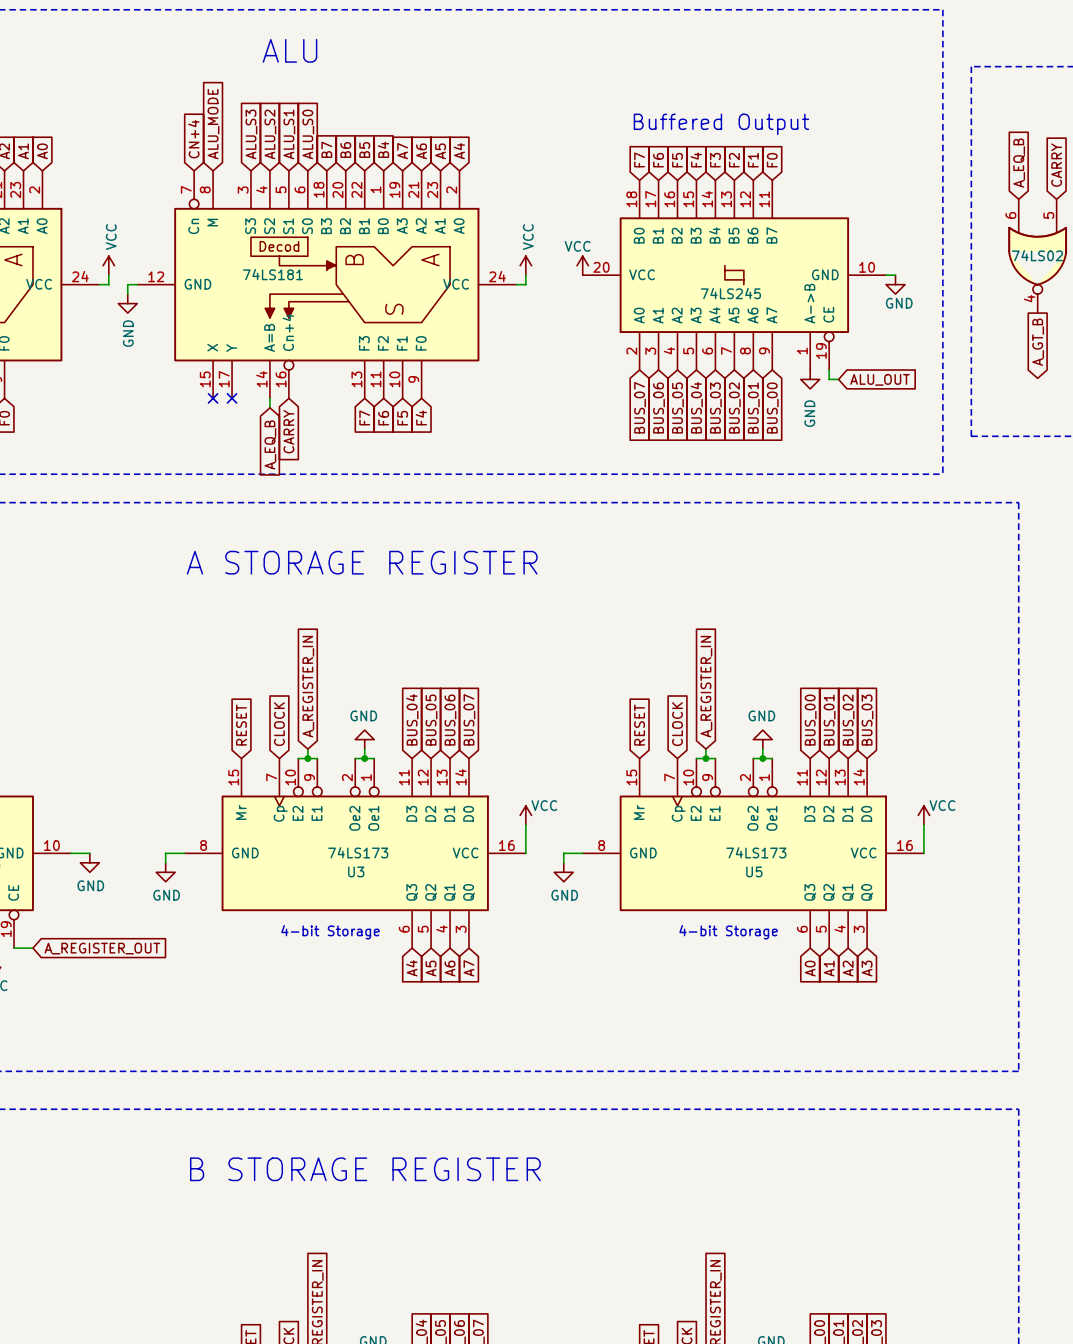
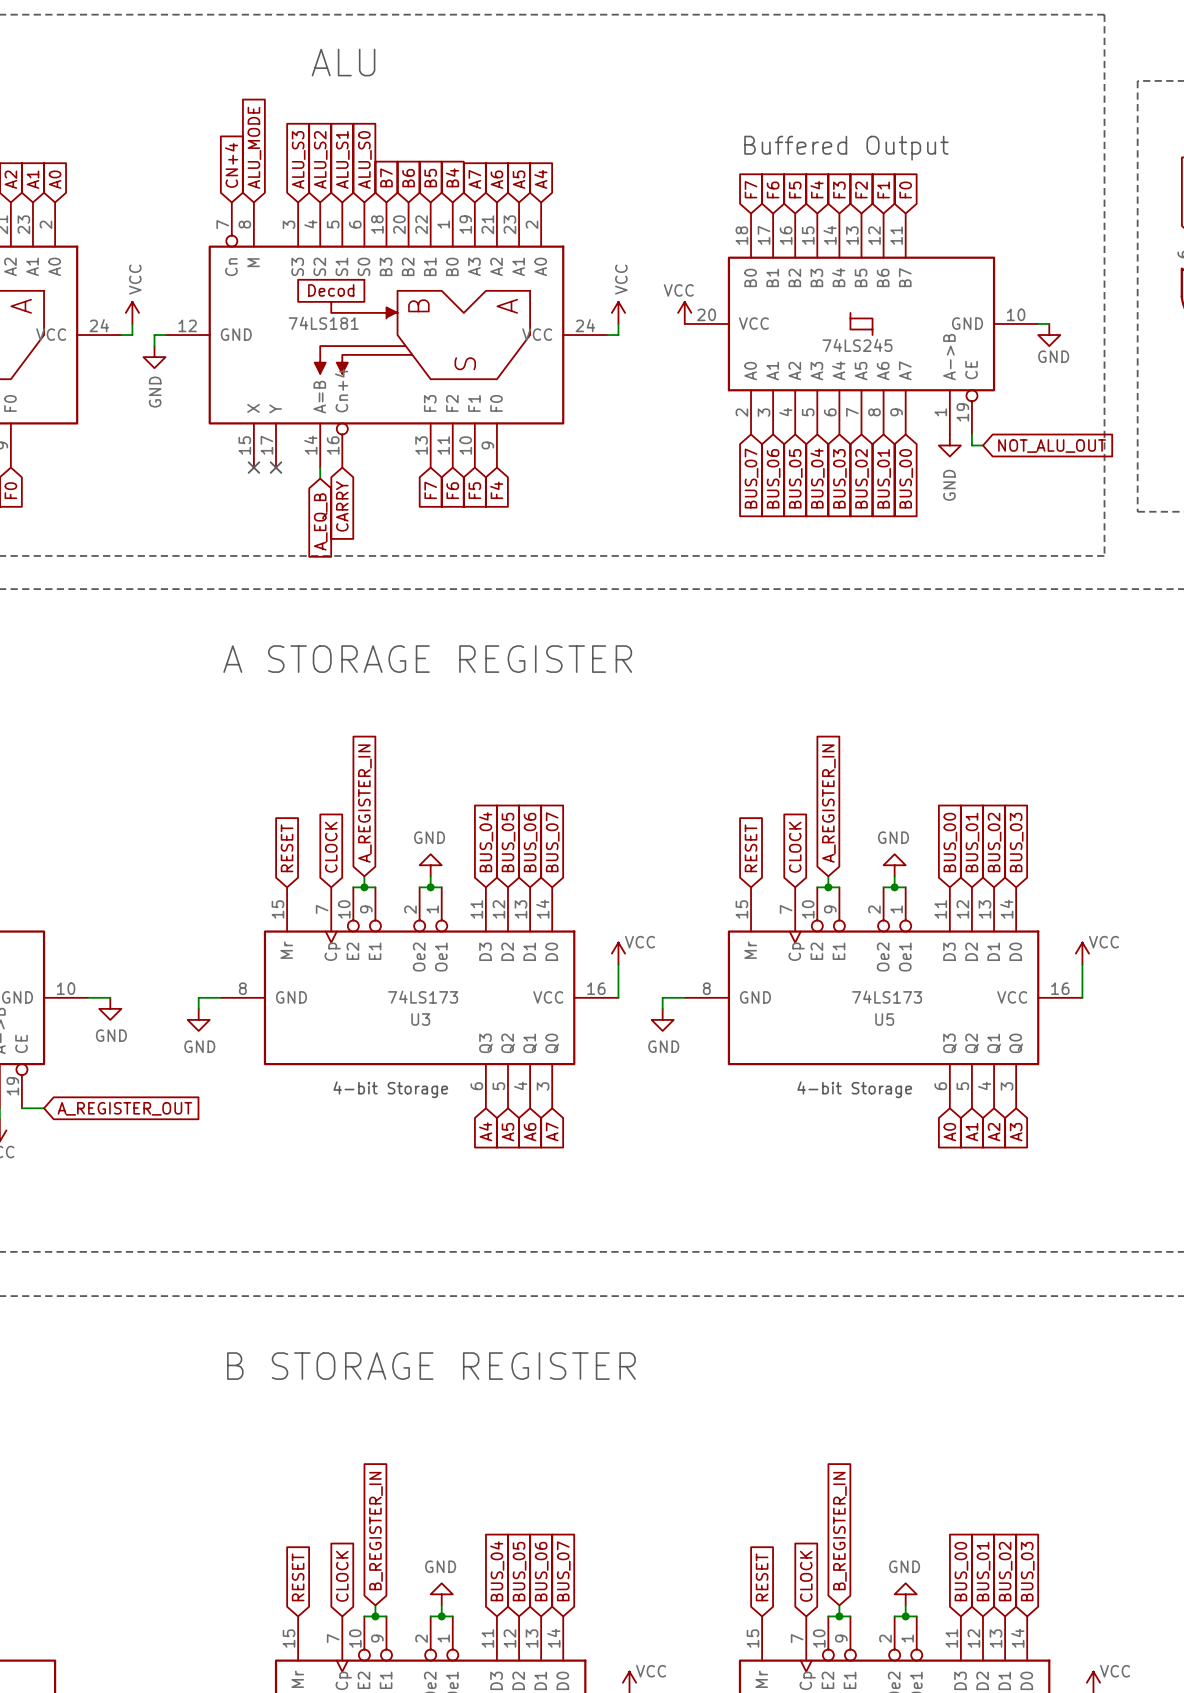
global label: ALU_OUT (880, 379) -> NOT_ALU_OUT (1052, 446)

